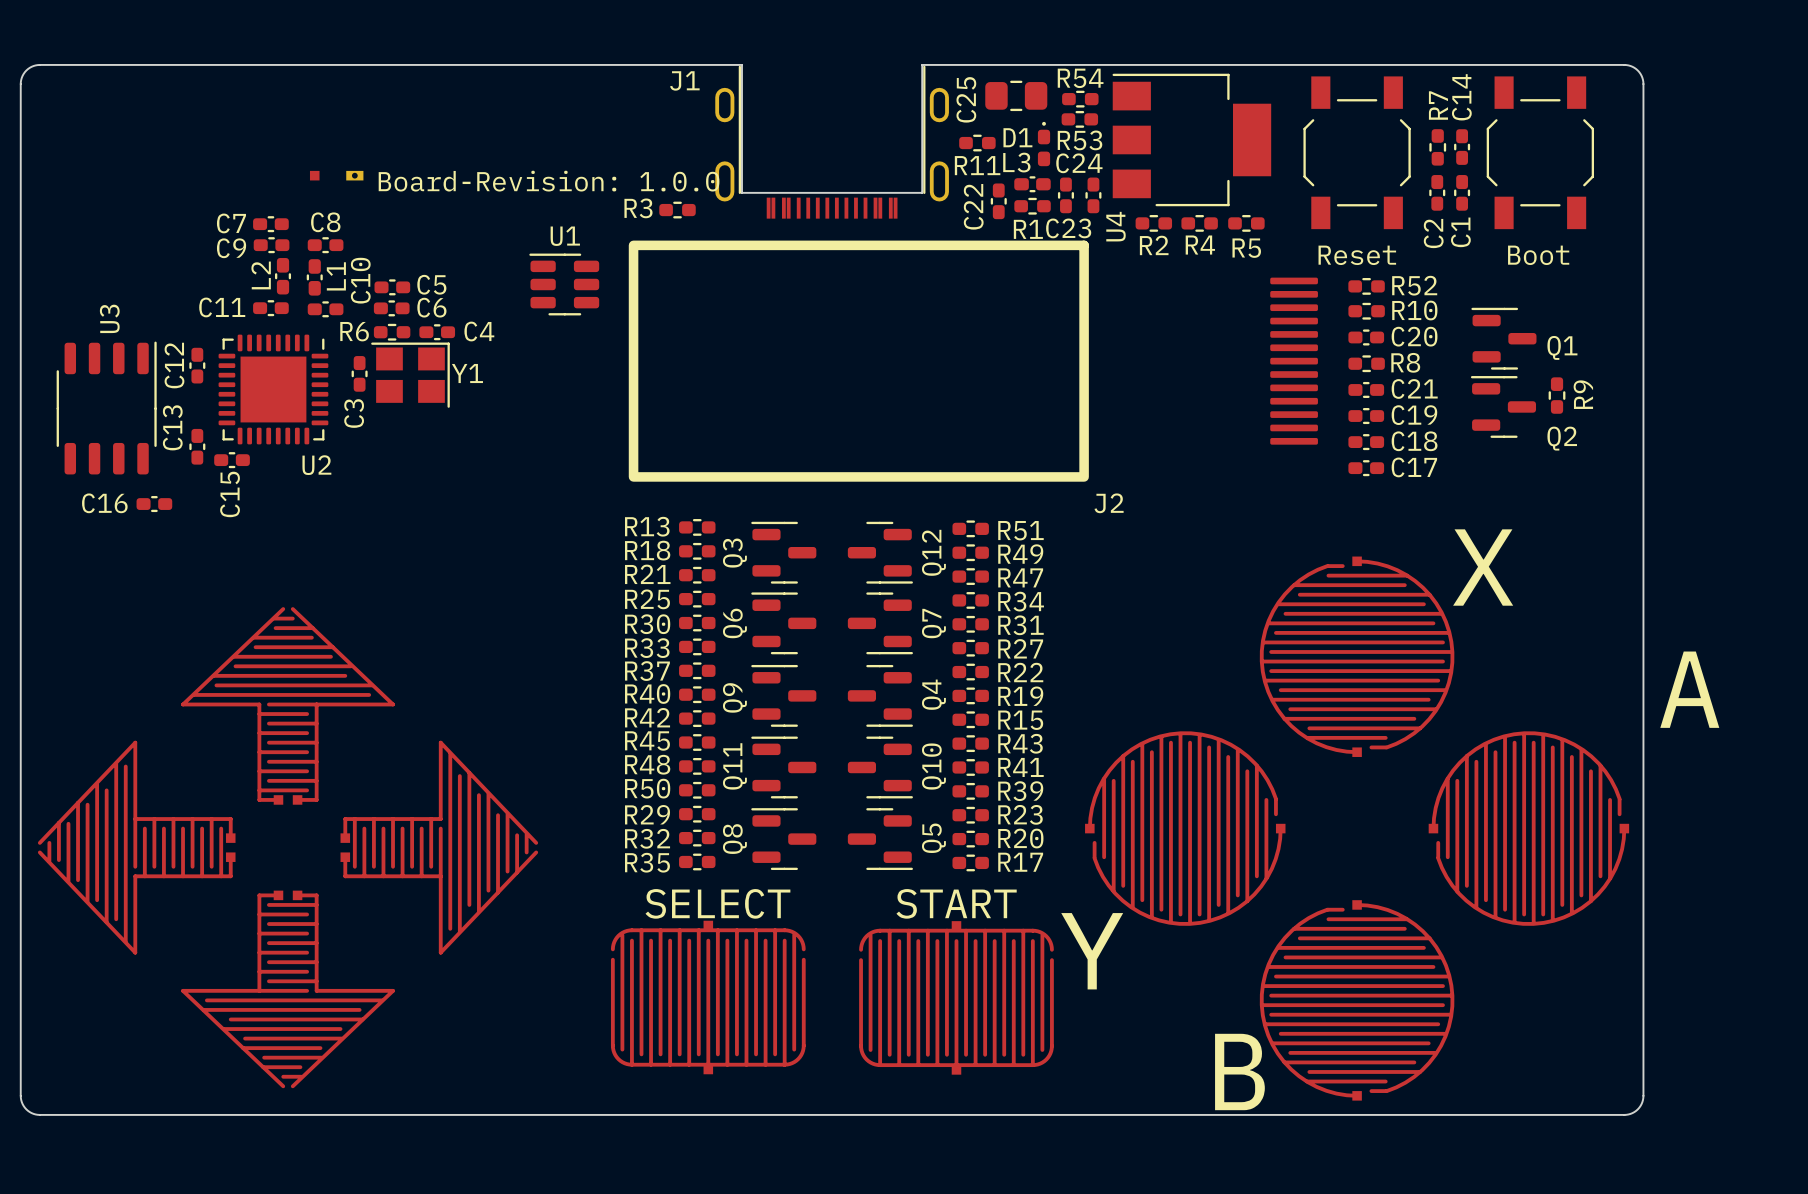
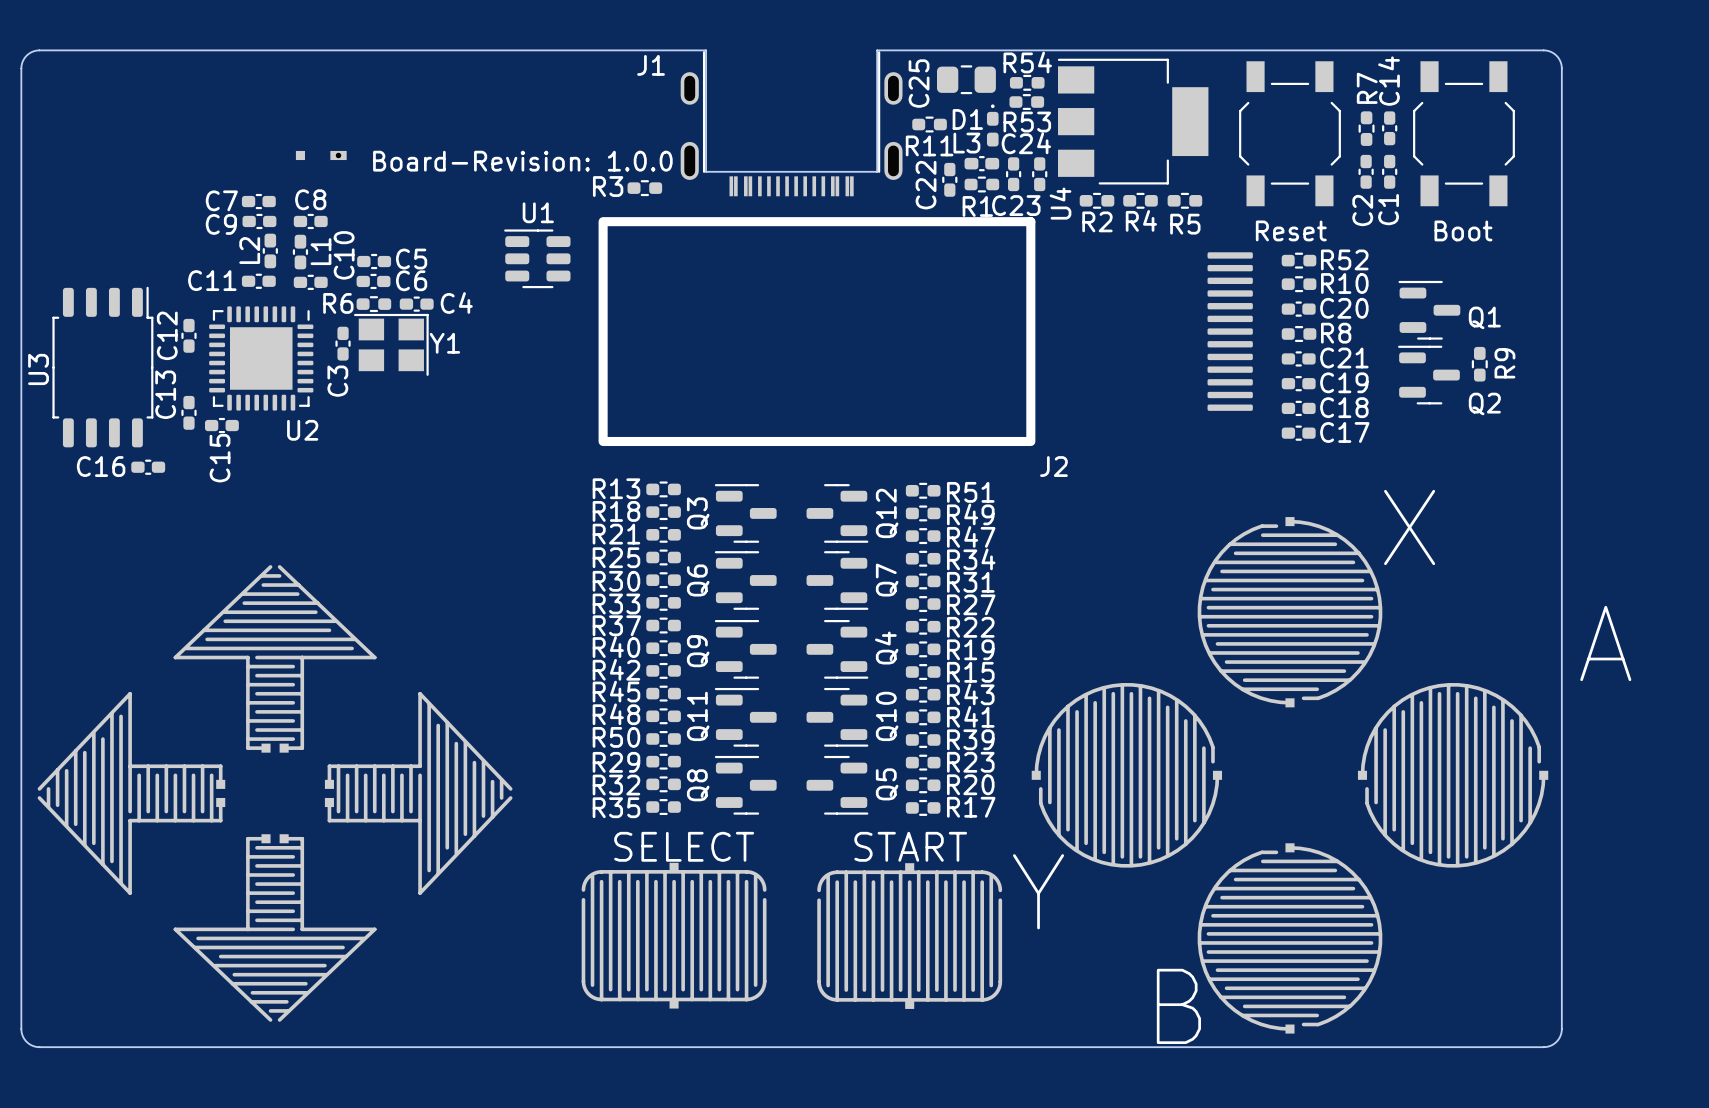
U3 name position: U3 (109, 318) -> U3 (38, 369)
U3 footprint: [56, 341, 157, 475] -> [52, 286, 154, 448]

